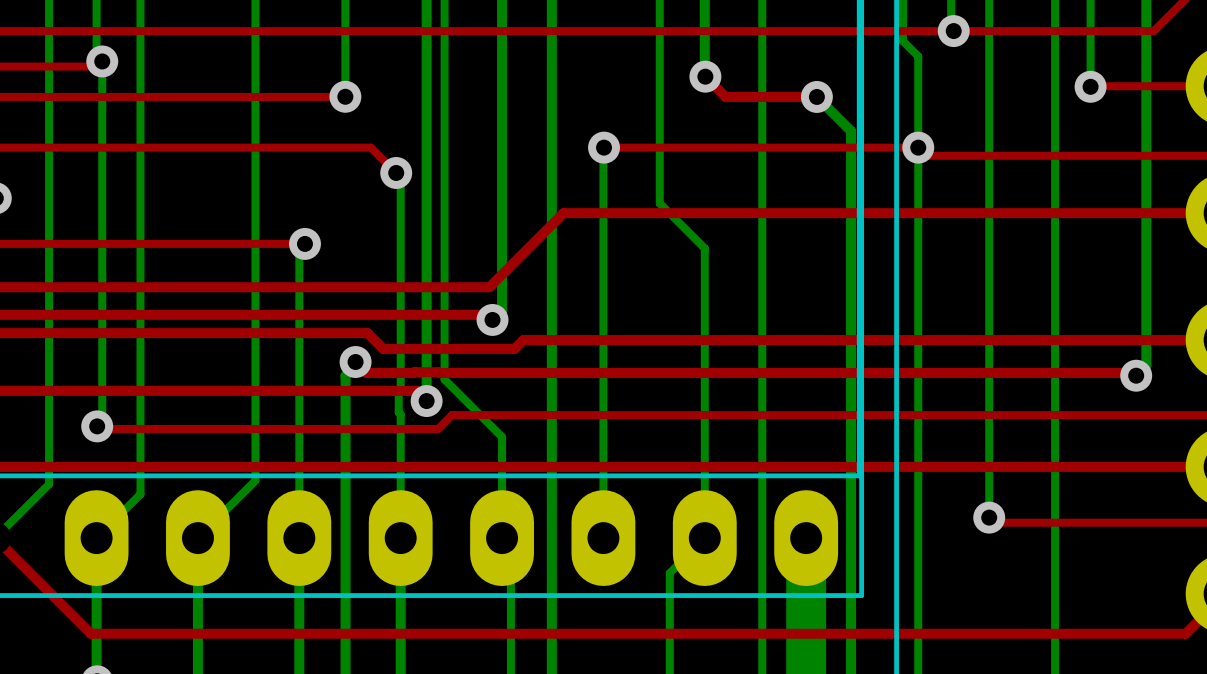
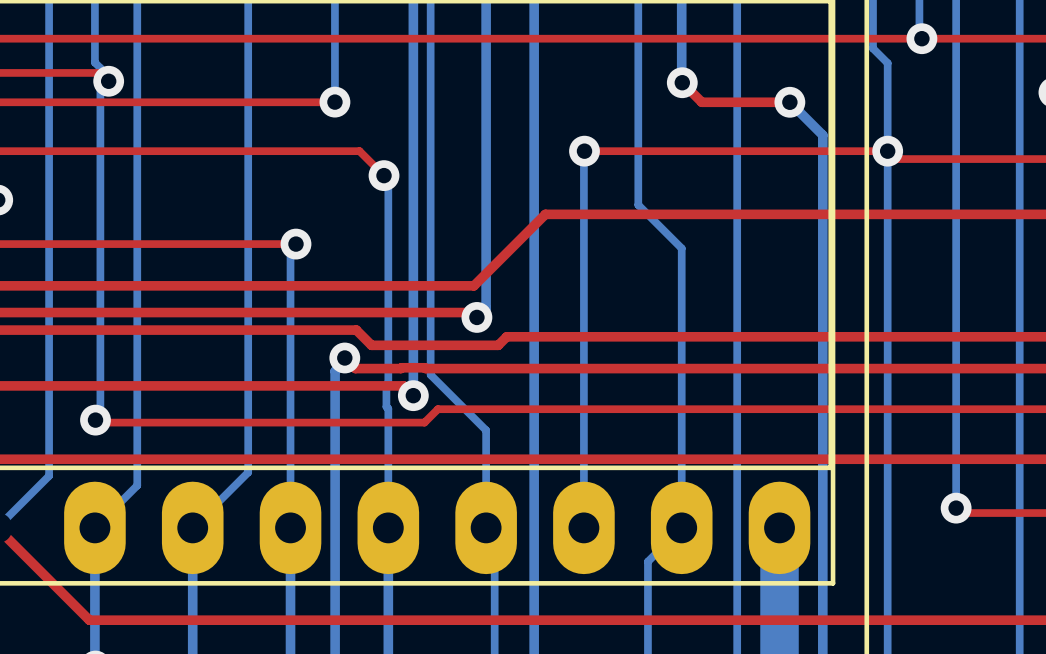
via position: (102, 61) -> (108, 81)

